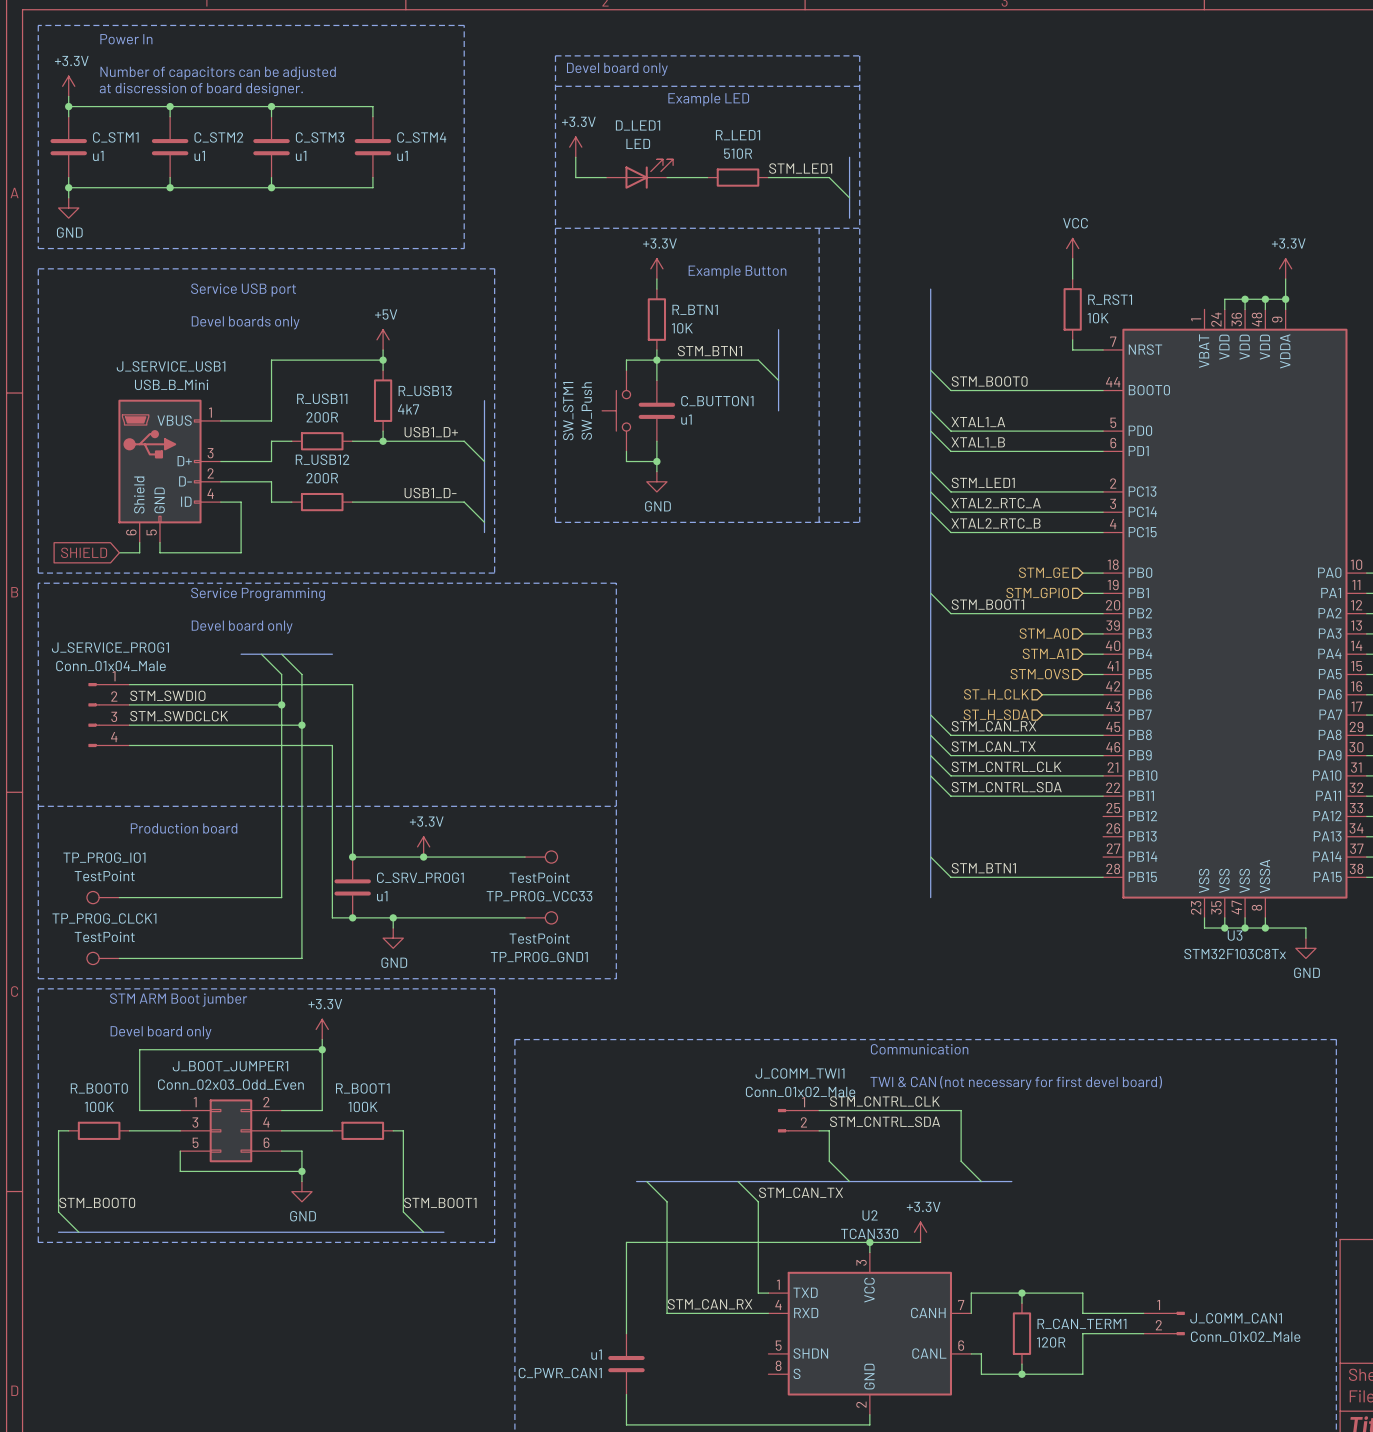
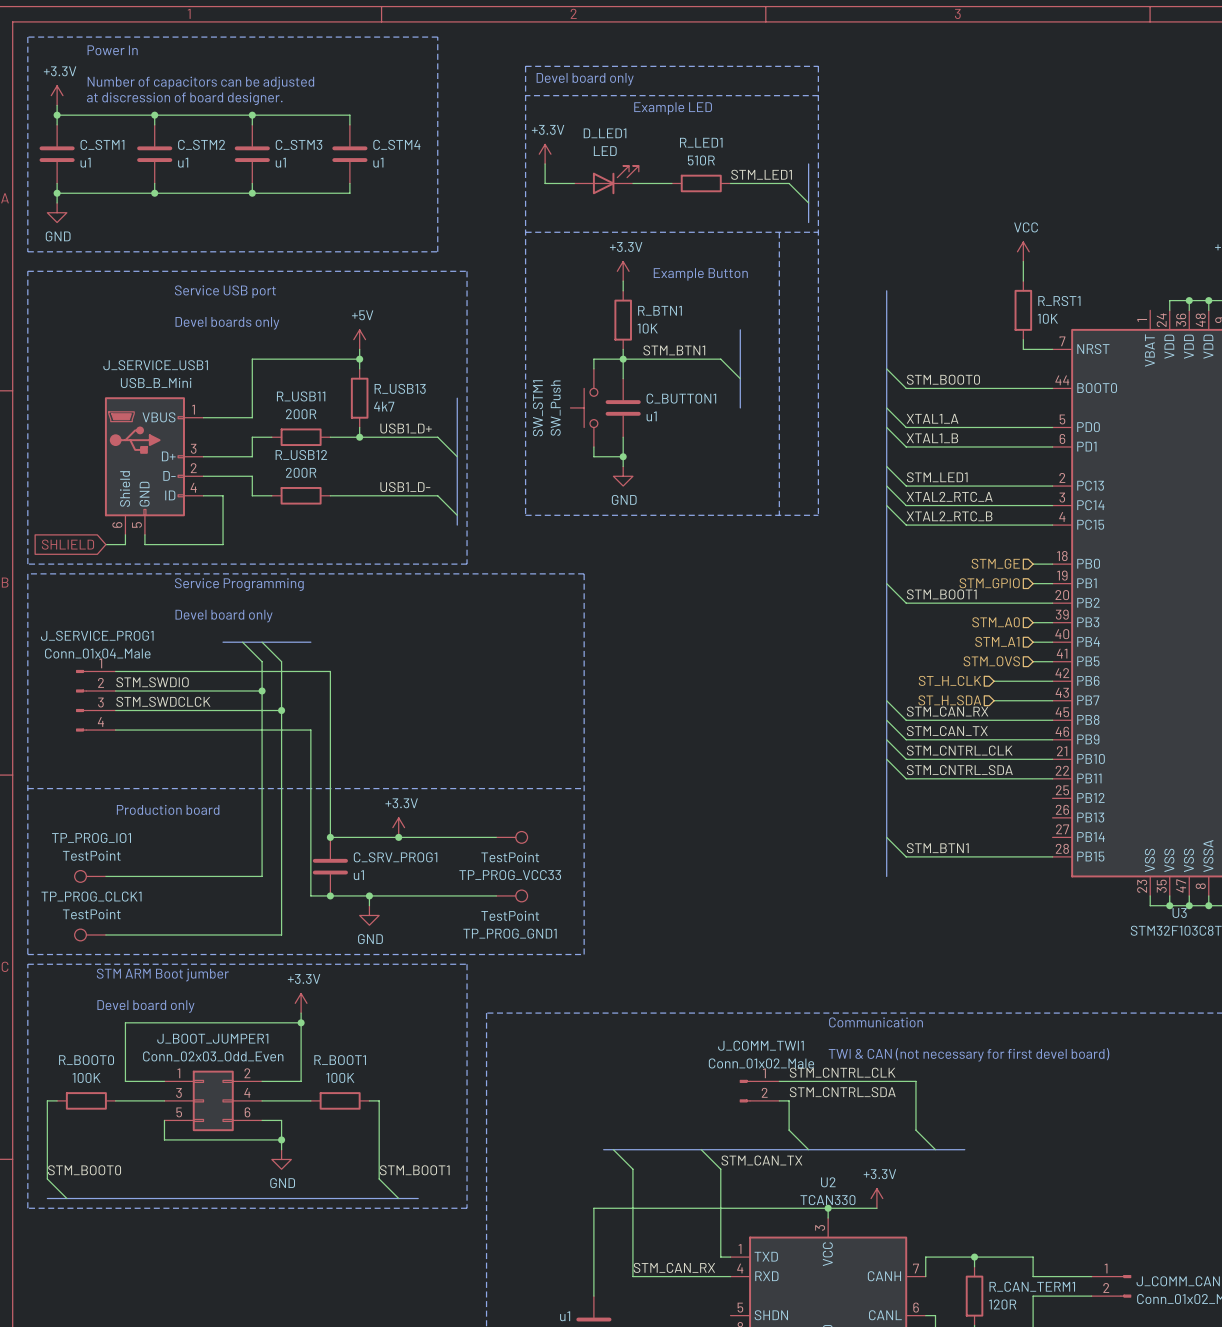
global label: SHIELD (84, 552) -> SHLIELD (67, 544)

